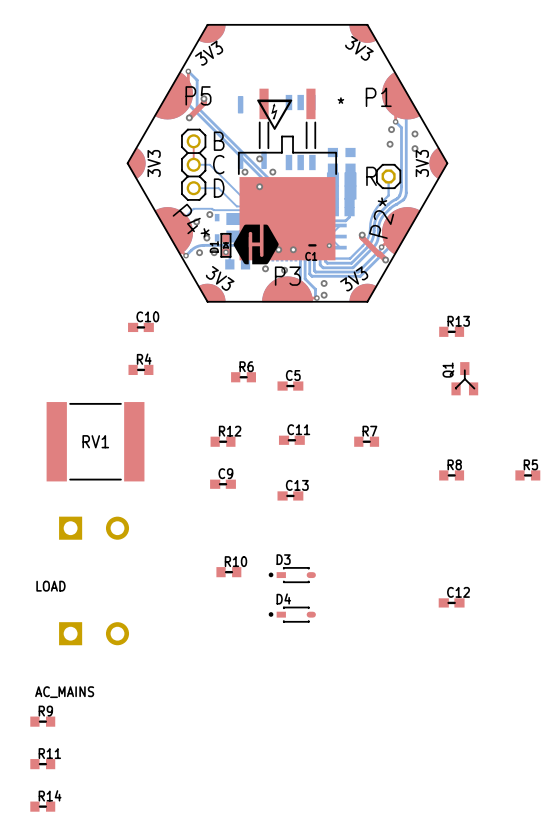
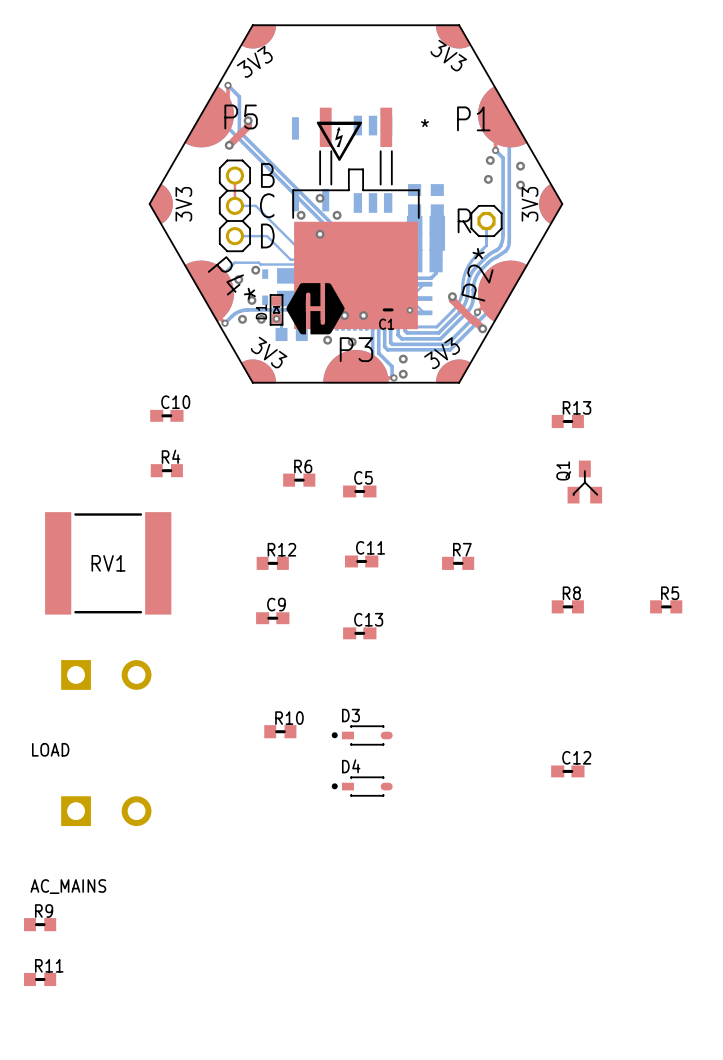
R14: (42, 806) -> none

